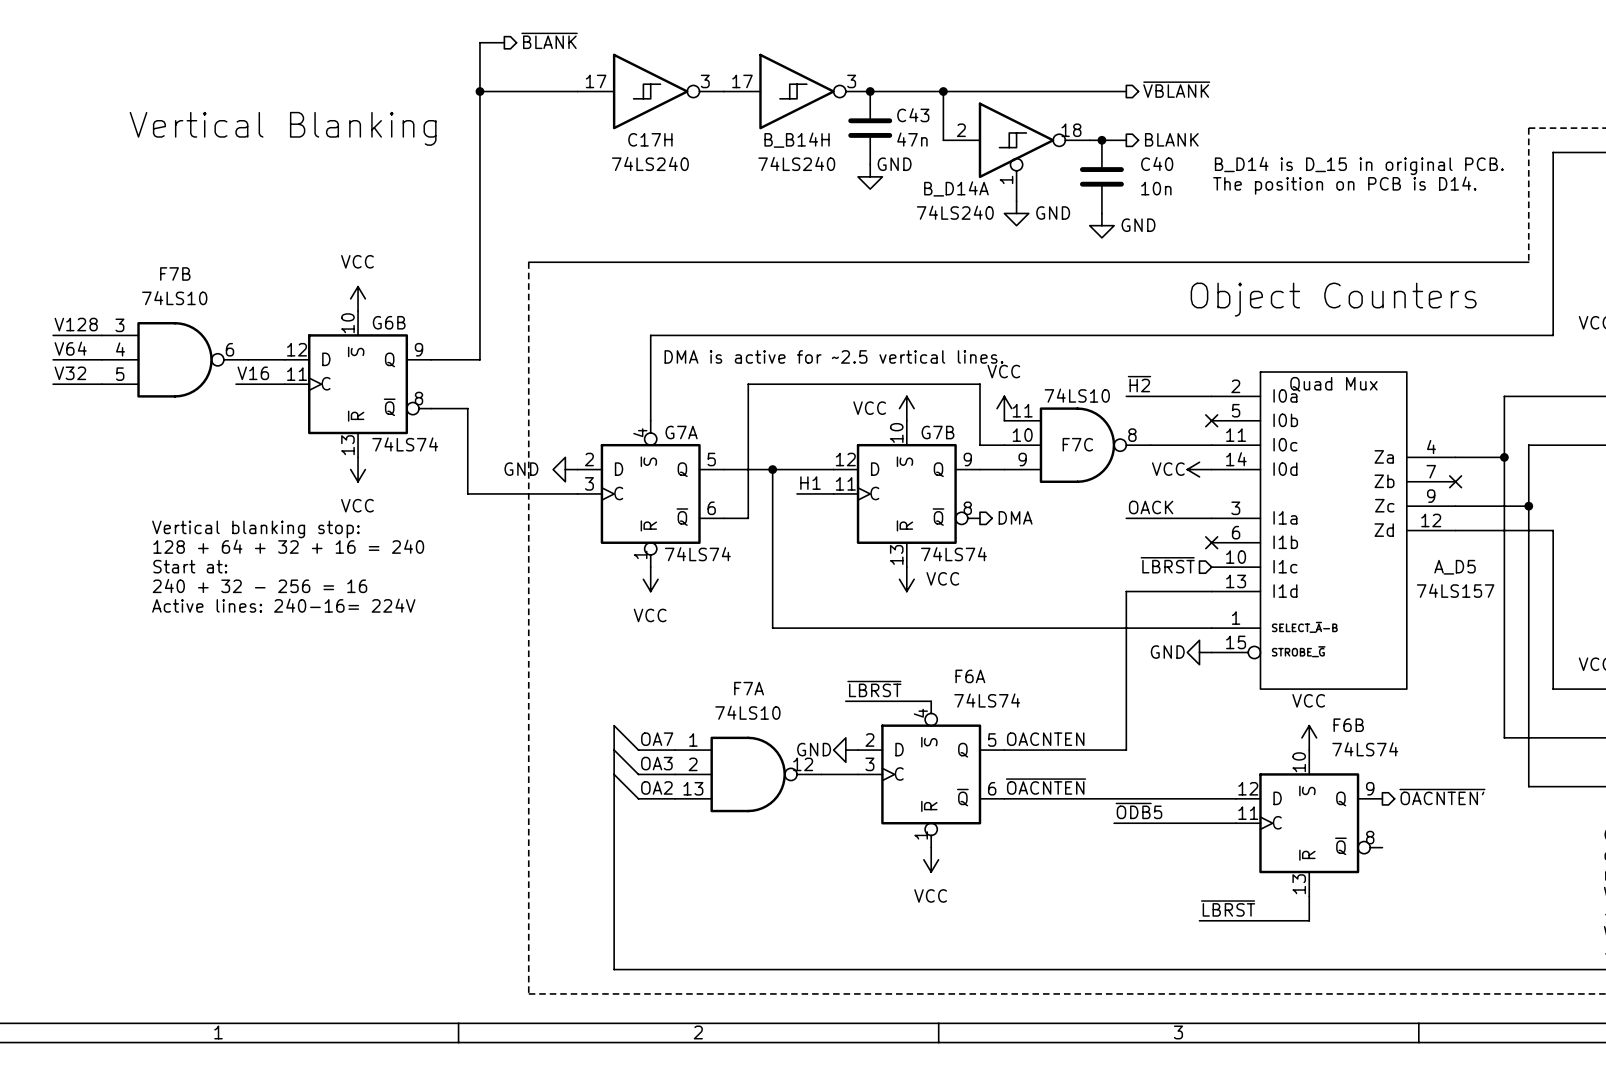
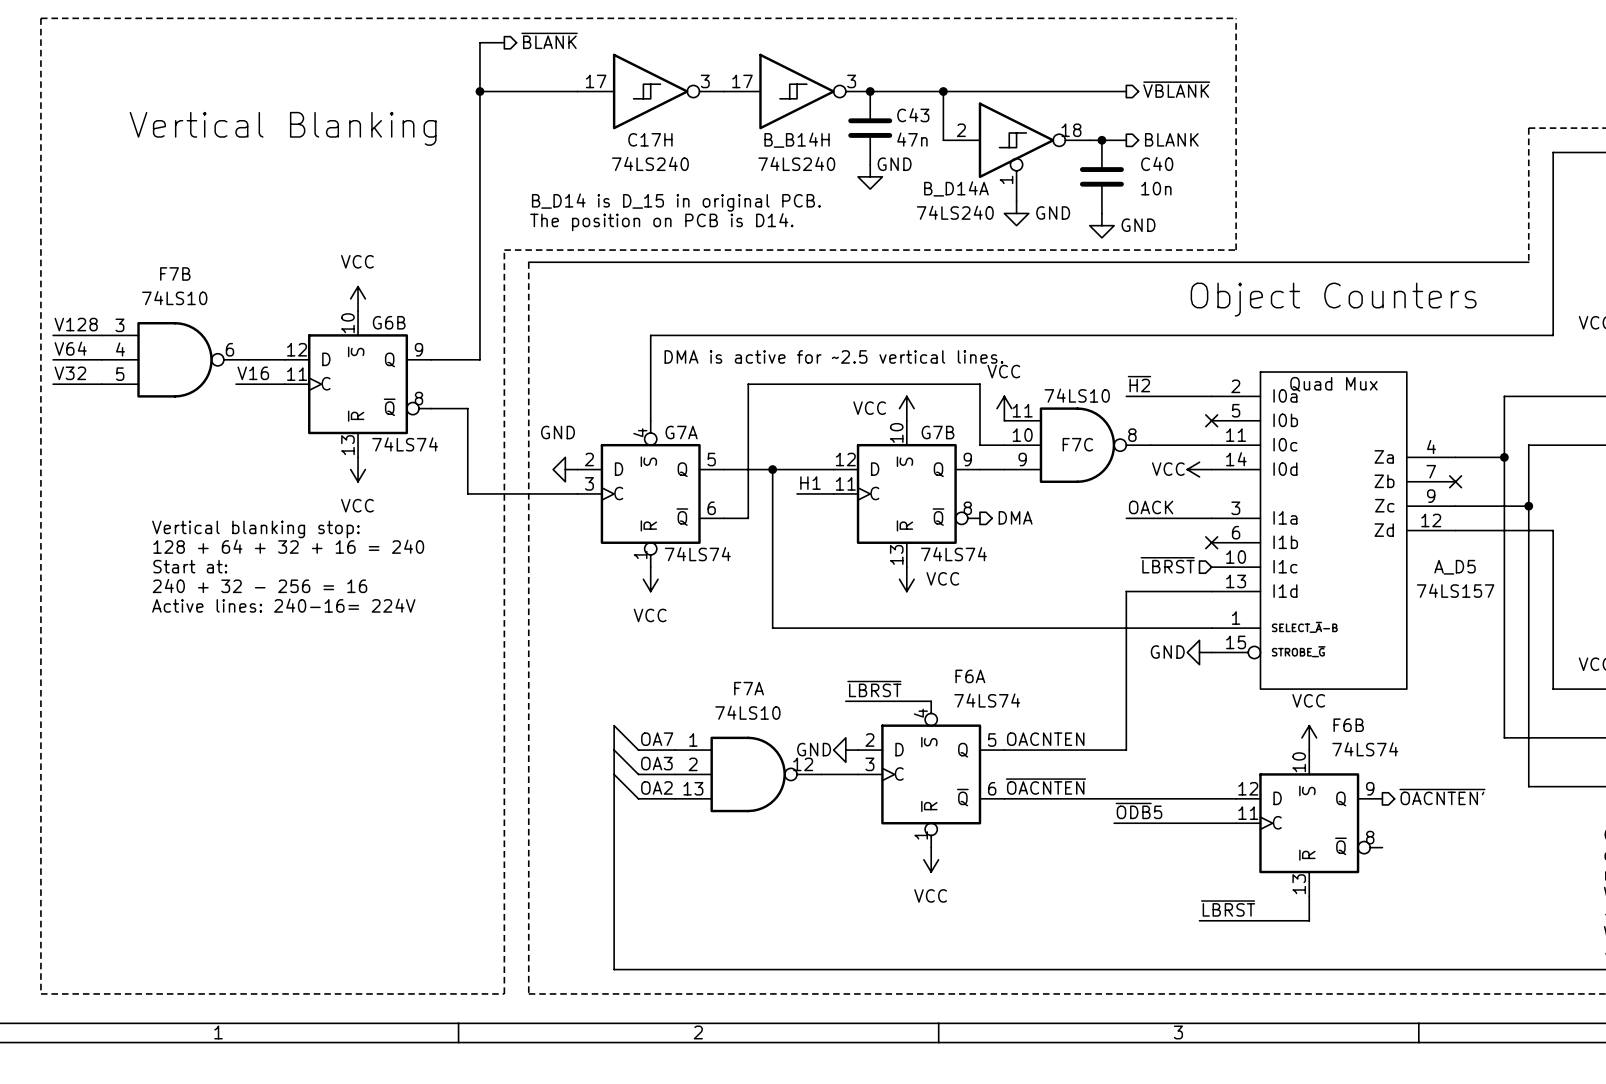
line: none -> (40, 18) (1236, 18) (1236, 250) (504, 250) (504, 993) (40, 993) (40, 18)
text: B_D14 is D_15 in original PCB. (1359, 165) -> none
text: The position on PCB is D14. (1344, 185) -> none
text: none -> B_D14 is D_15 in original PCB. (676, 202)
text: none -> The position on PCB is D14. (661, 222)
power symbol text position: GND (521, 469) -> GND (557, 432)

